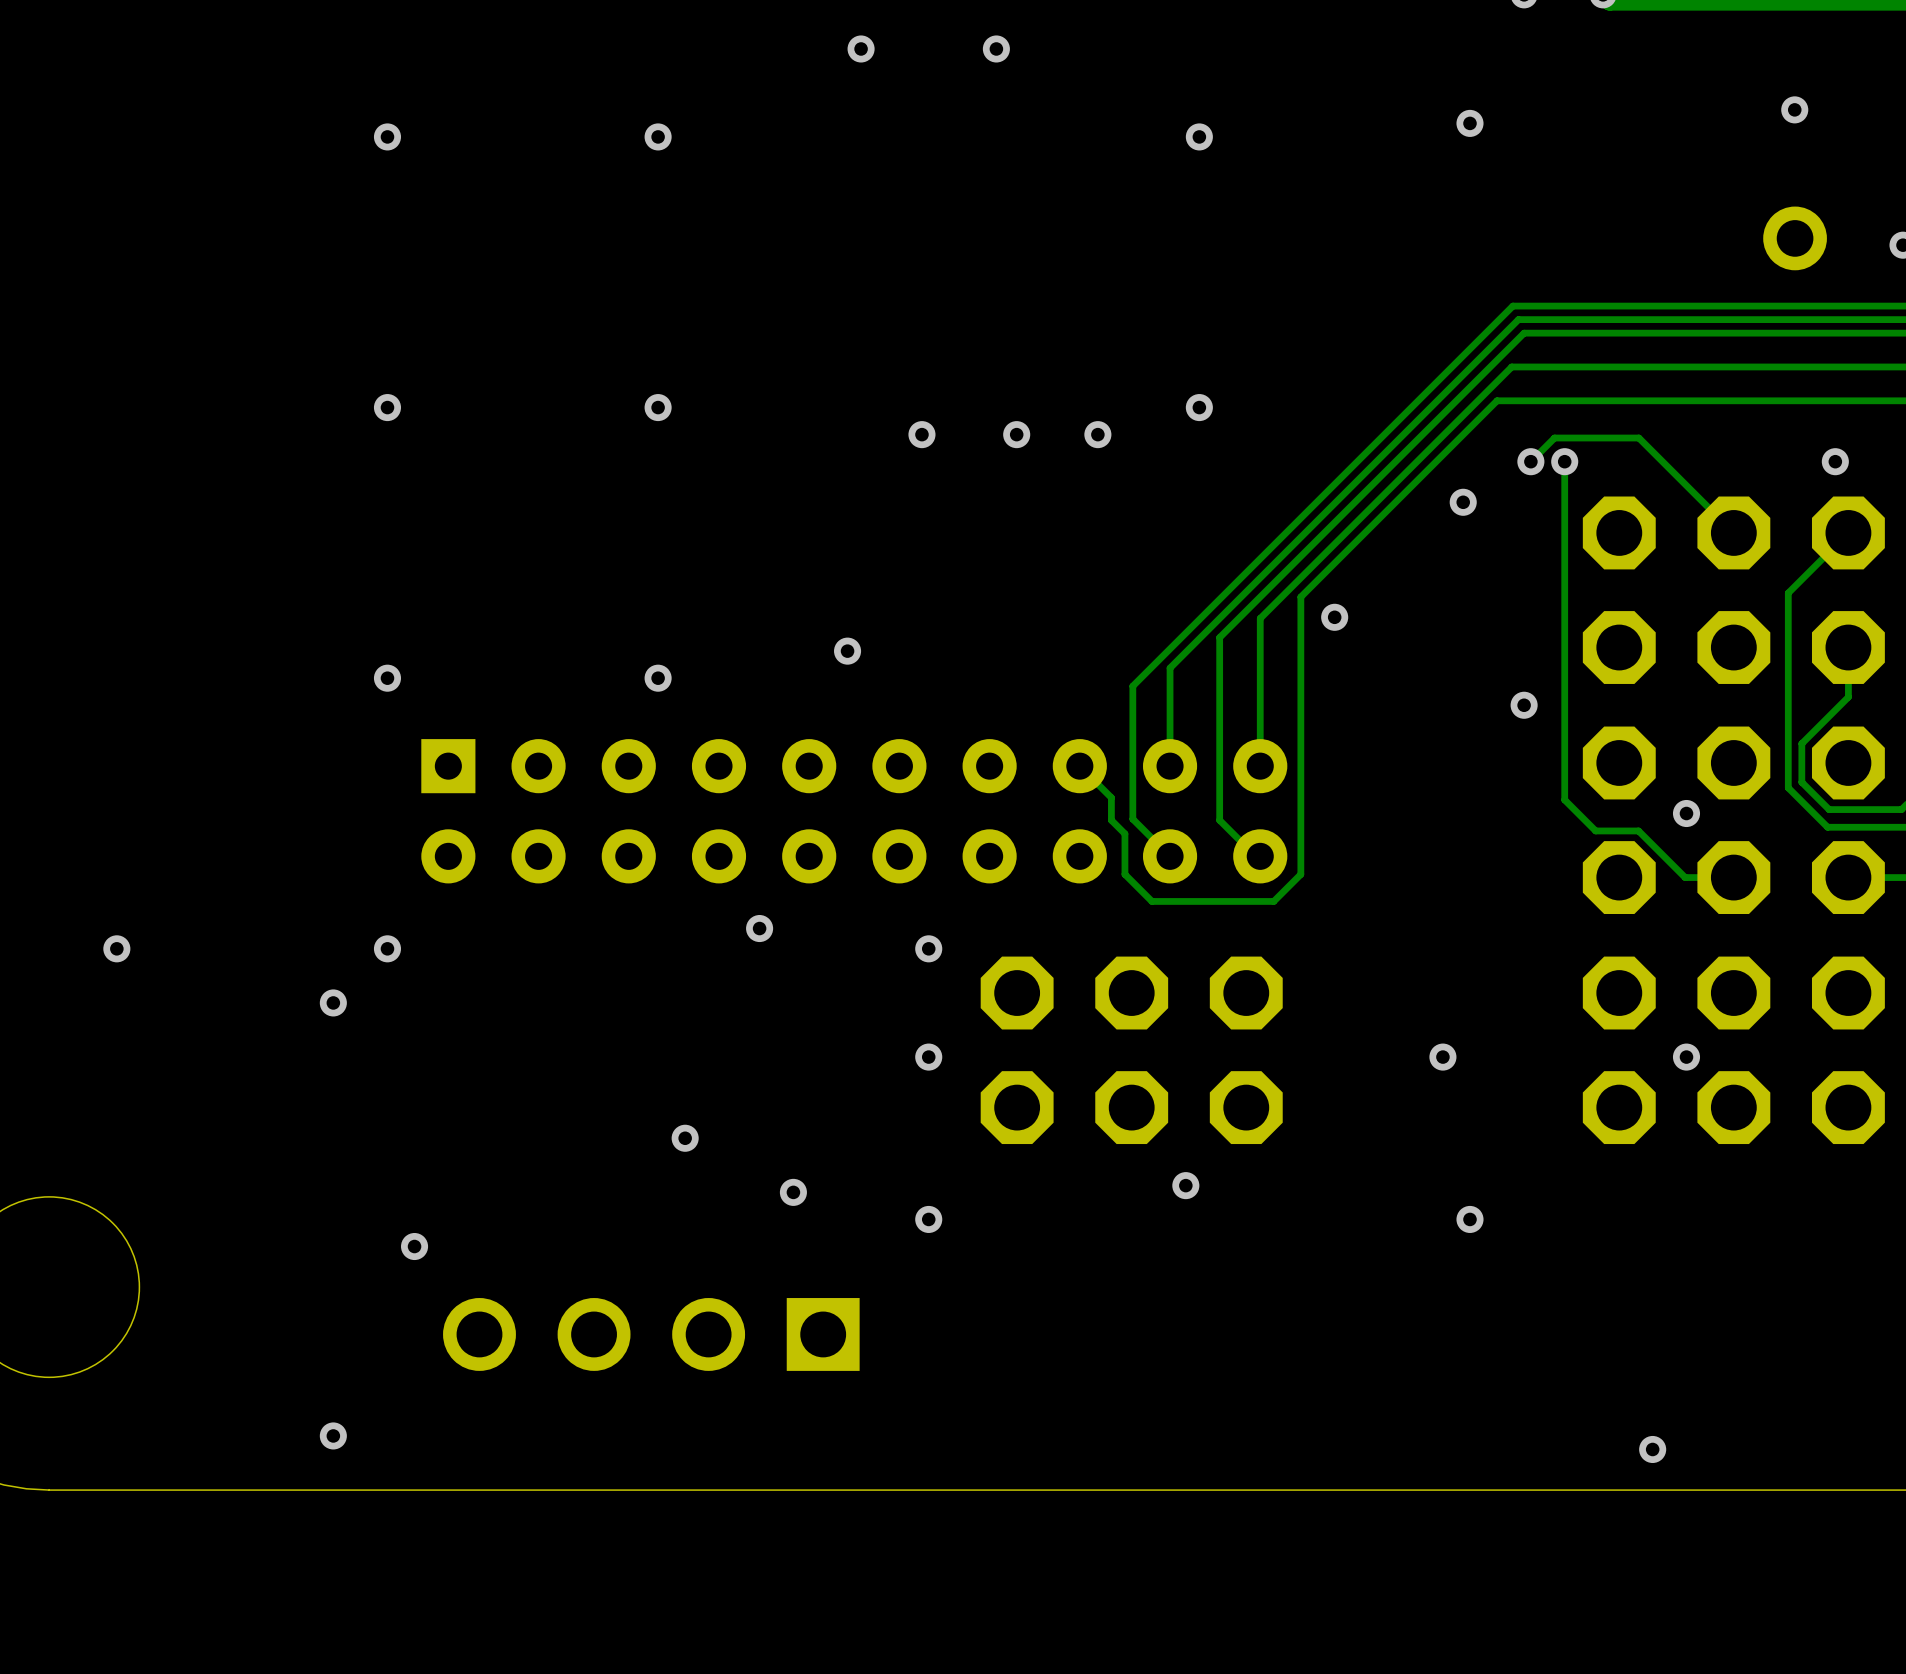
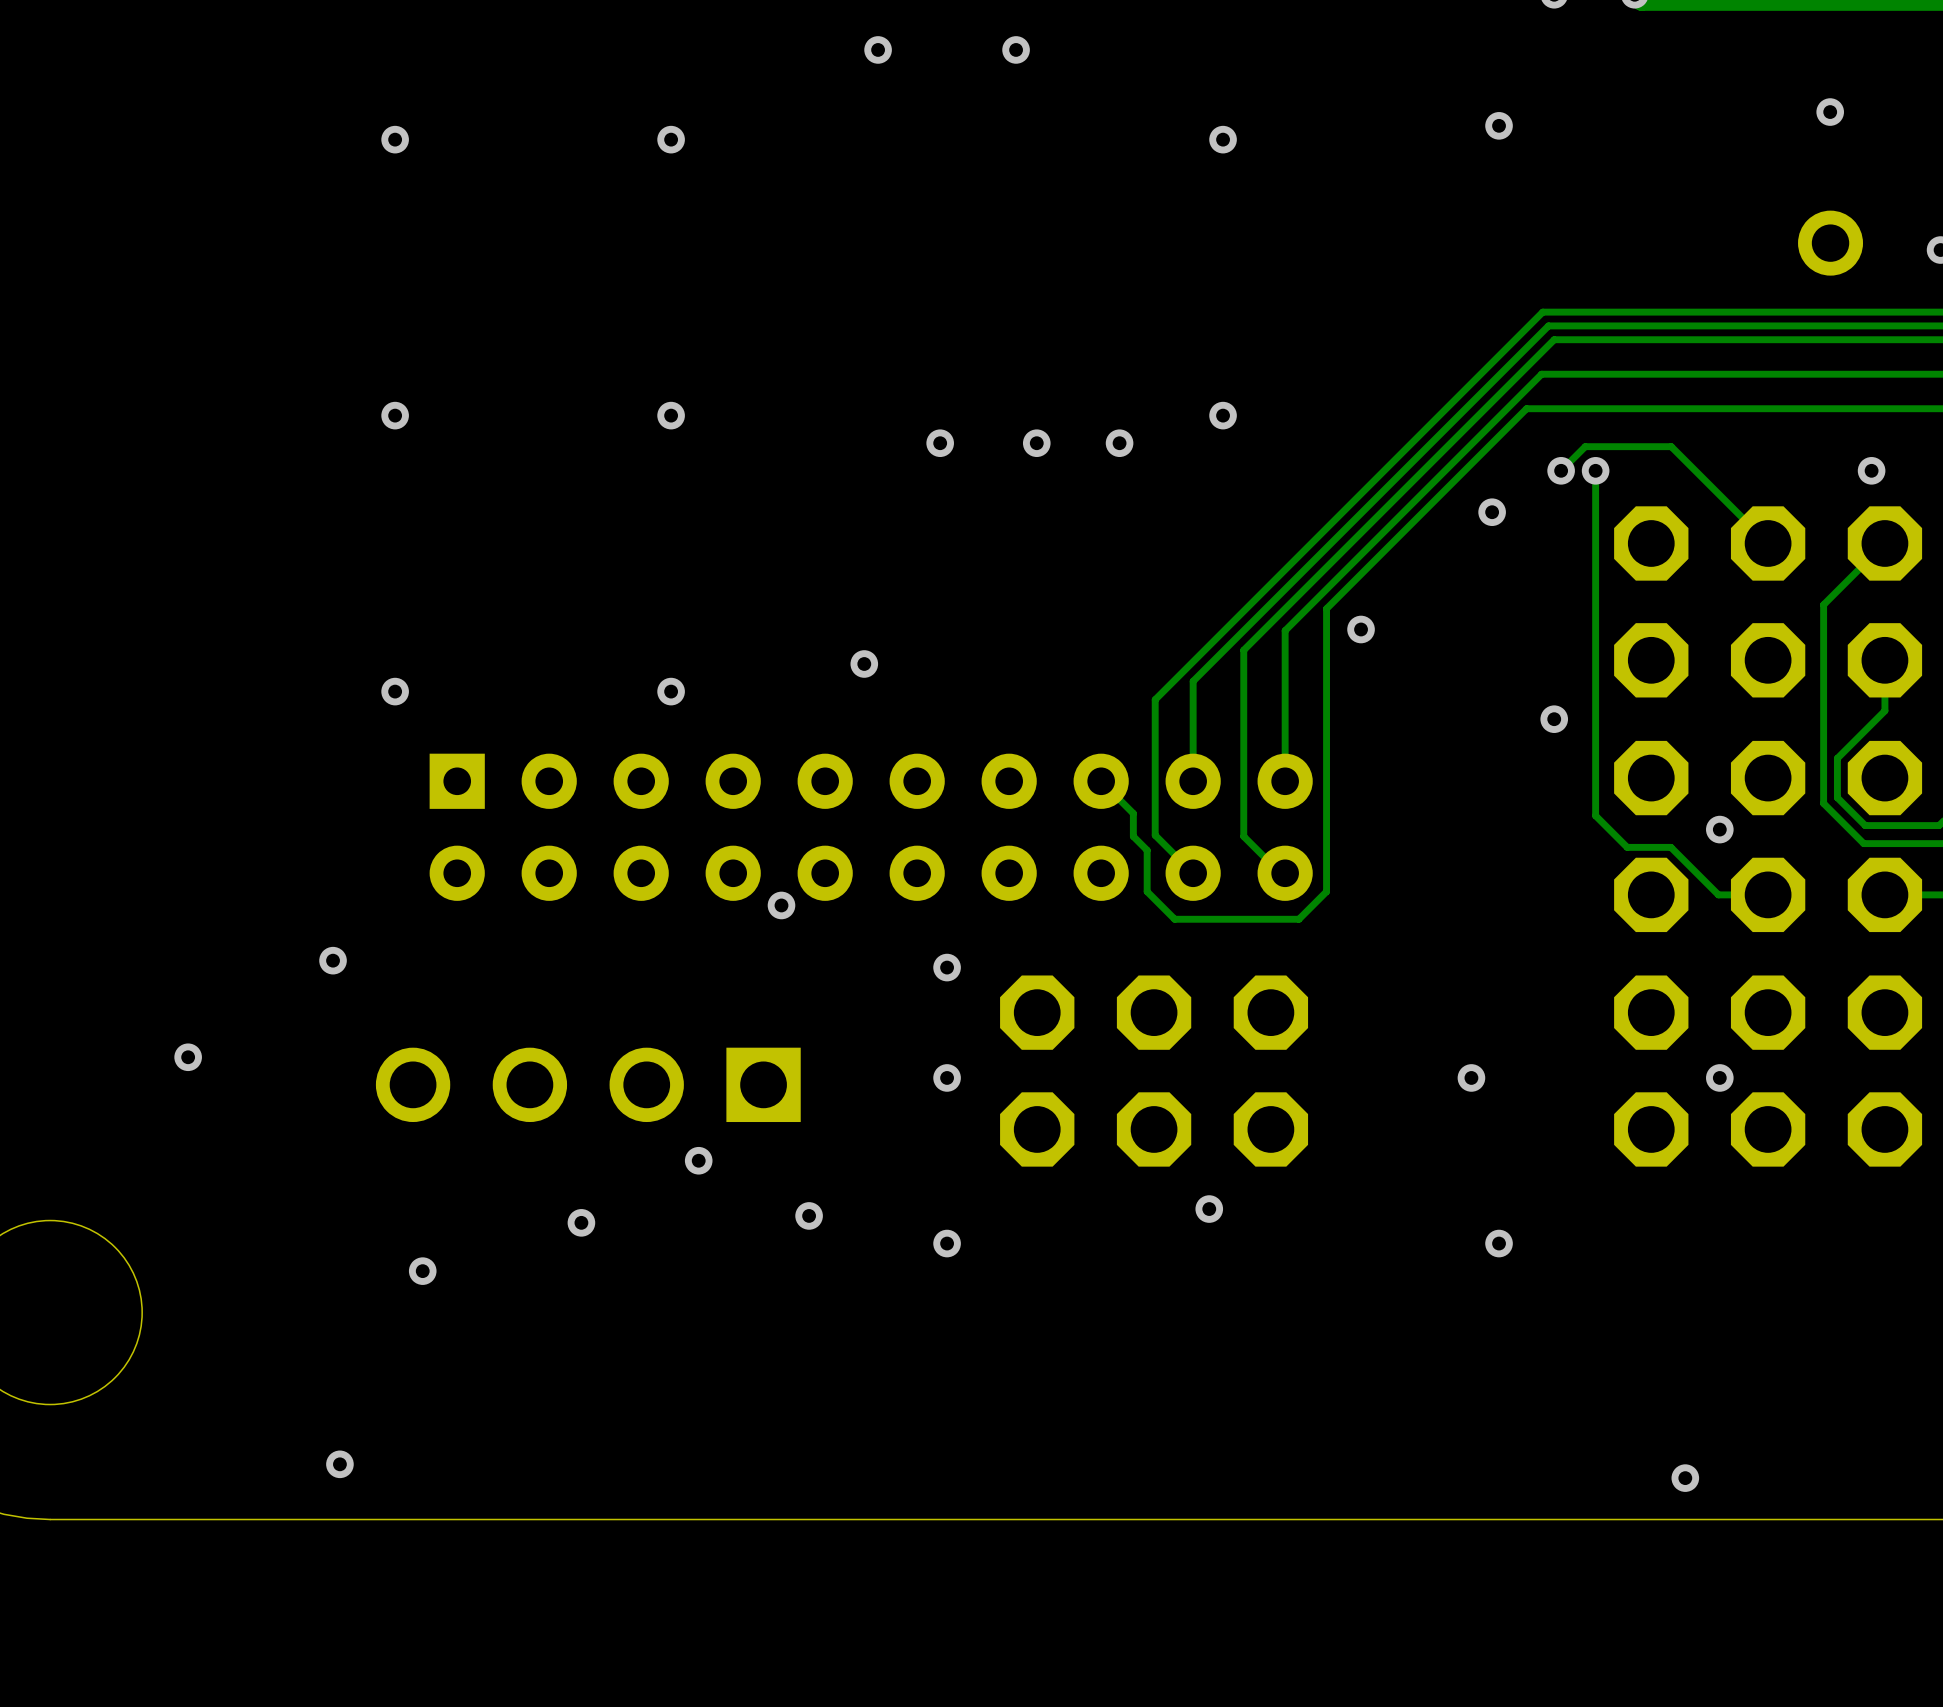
via position: (759, 928) -> (781, 905)
via: none -> (333, 960)
via: (116, 948) -> none
via: (387, 948) -> none
via: (333, 1002) -> none
via: none -> (188, 1057)
via: none -> (581, 1222)
part position: (651, 1334) -> (588, 1084)

